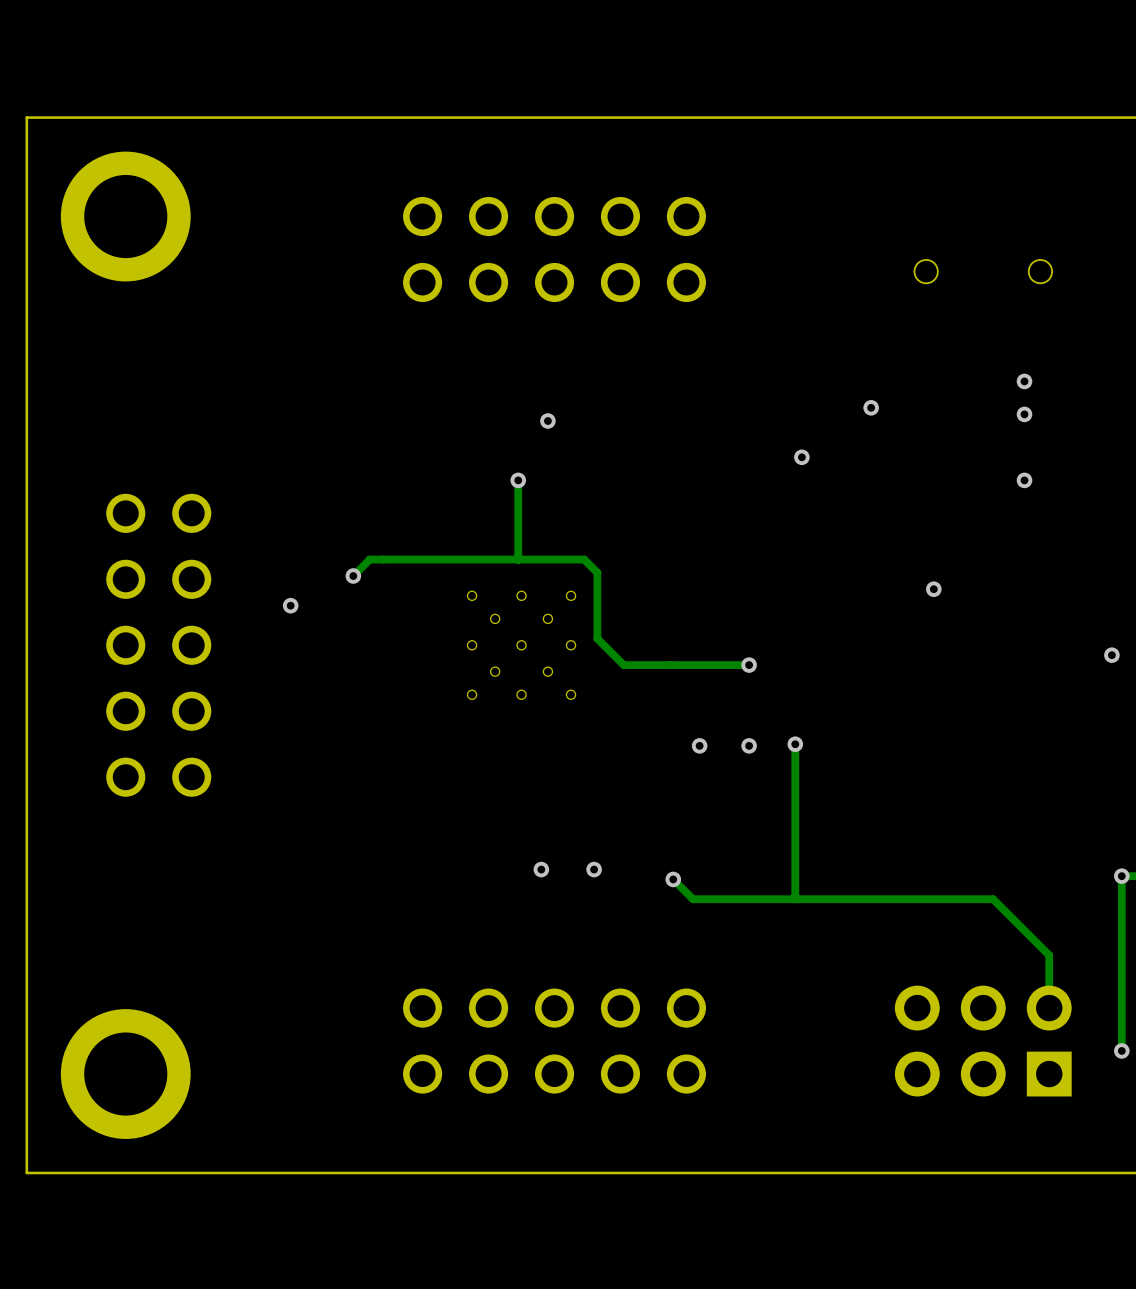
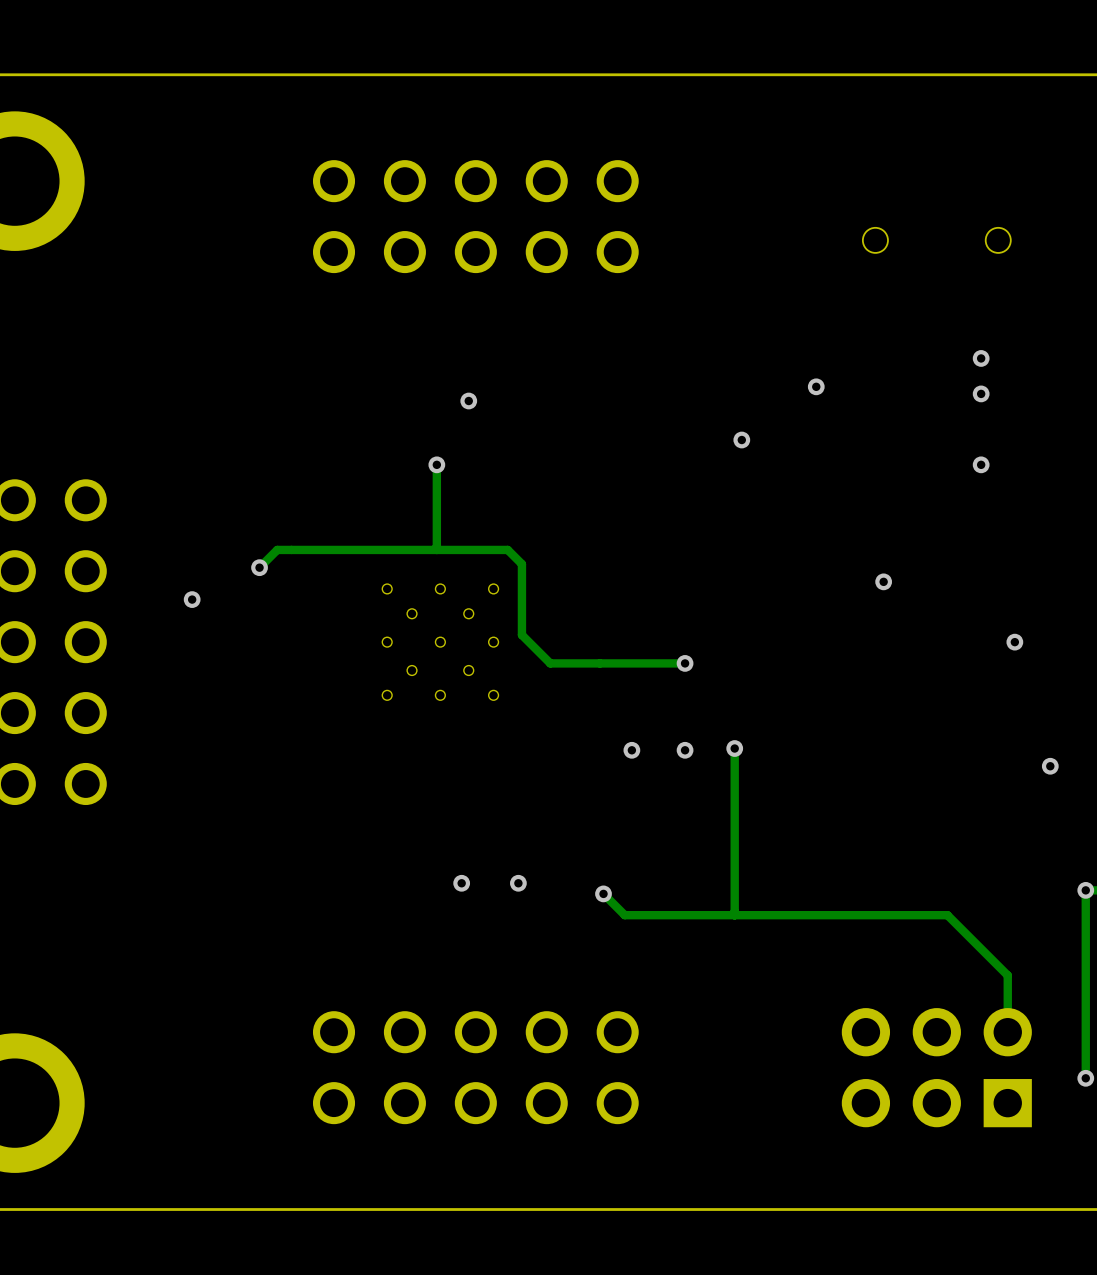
via: none -> (1014, 642)
via: (1111, 655) -> none
via: none -> (1050, 766)

